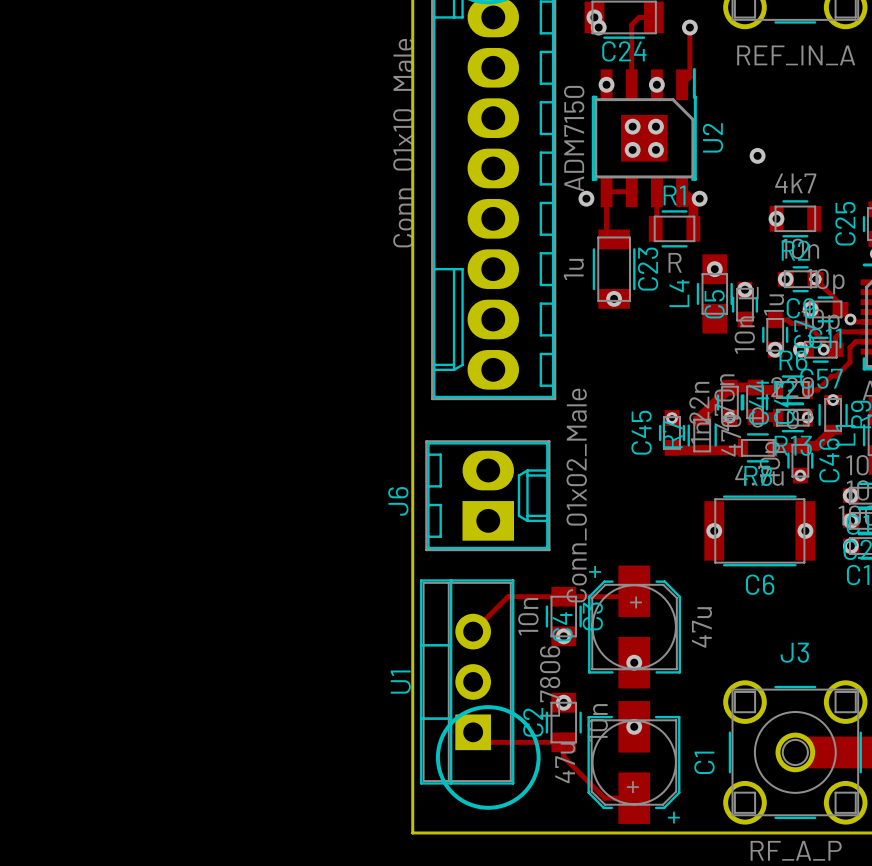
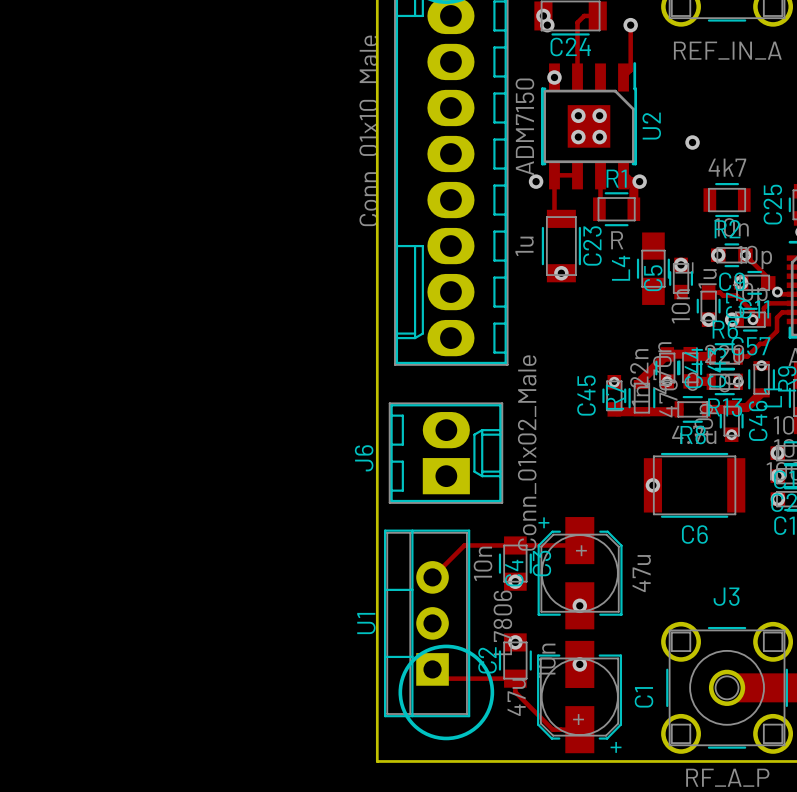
via: (656, 84) -> none
via: (776, 218) -> none
via: (714, 269) -> none
via: (805, 530) -> none

